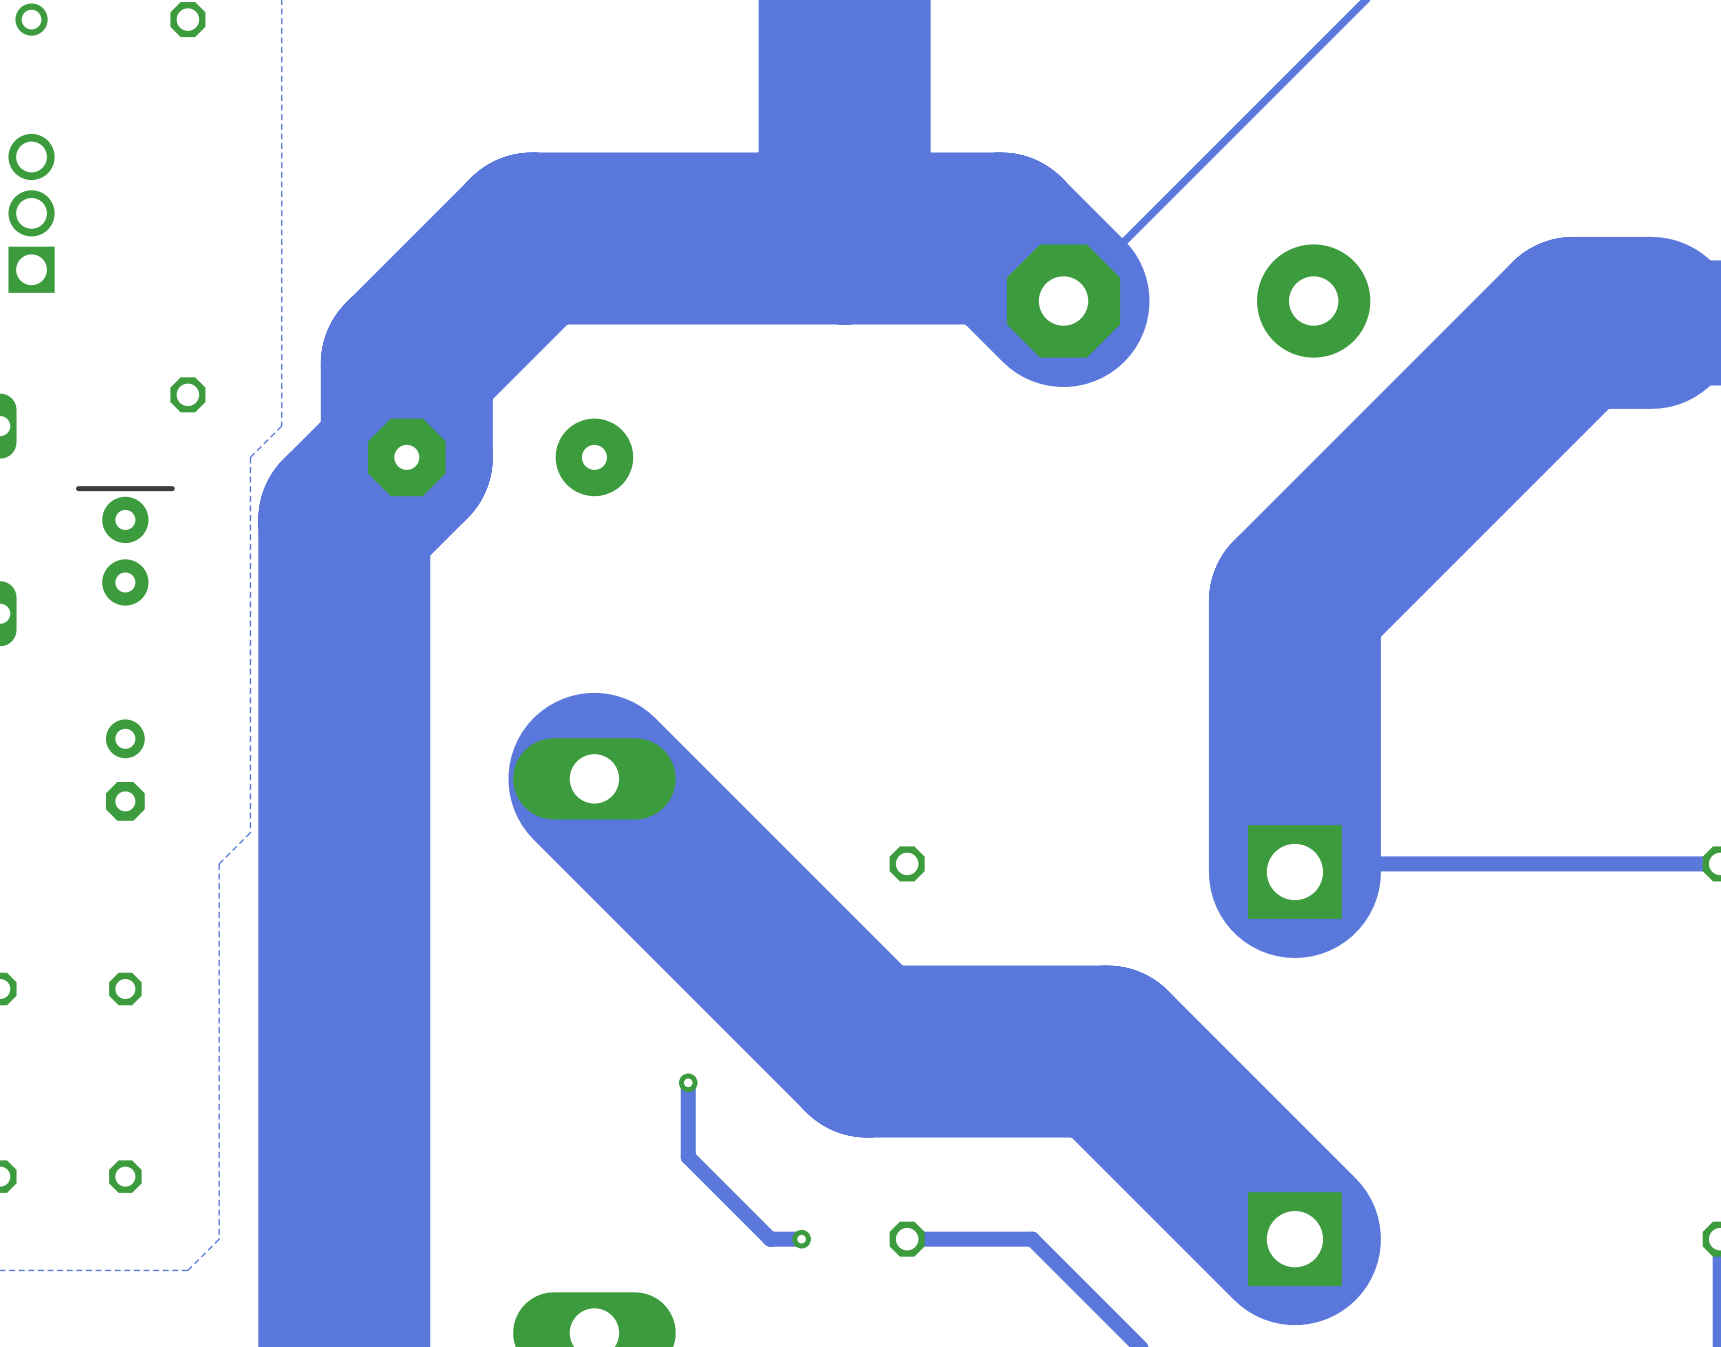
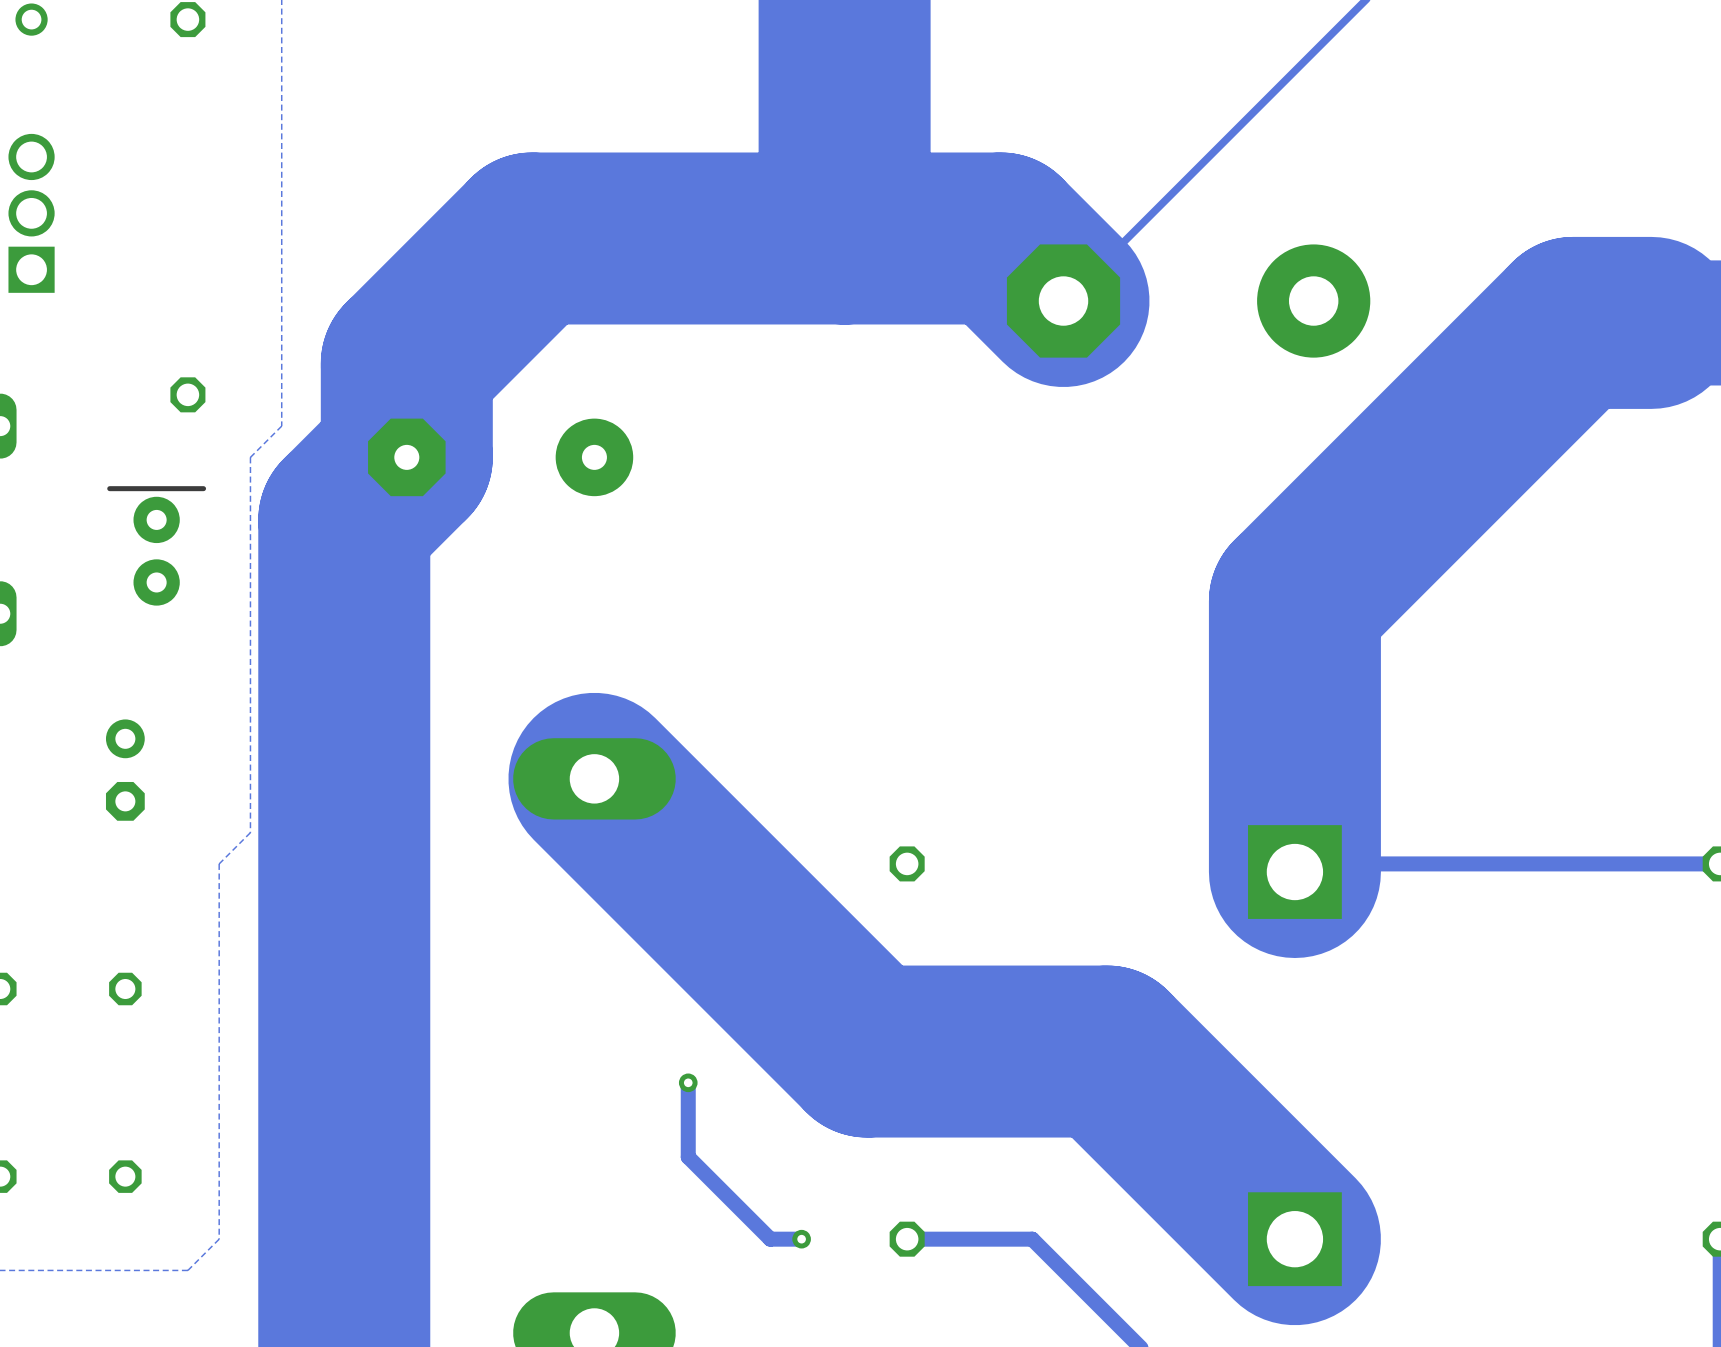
part position: (125, 545) -> (156, 545)

